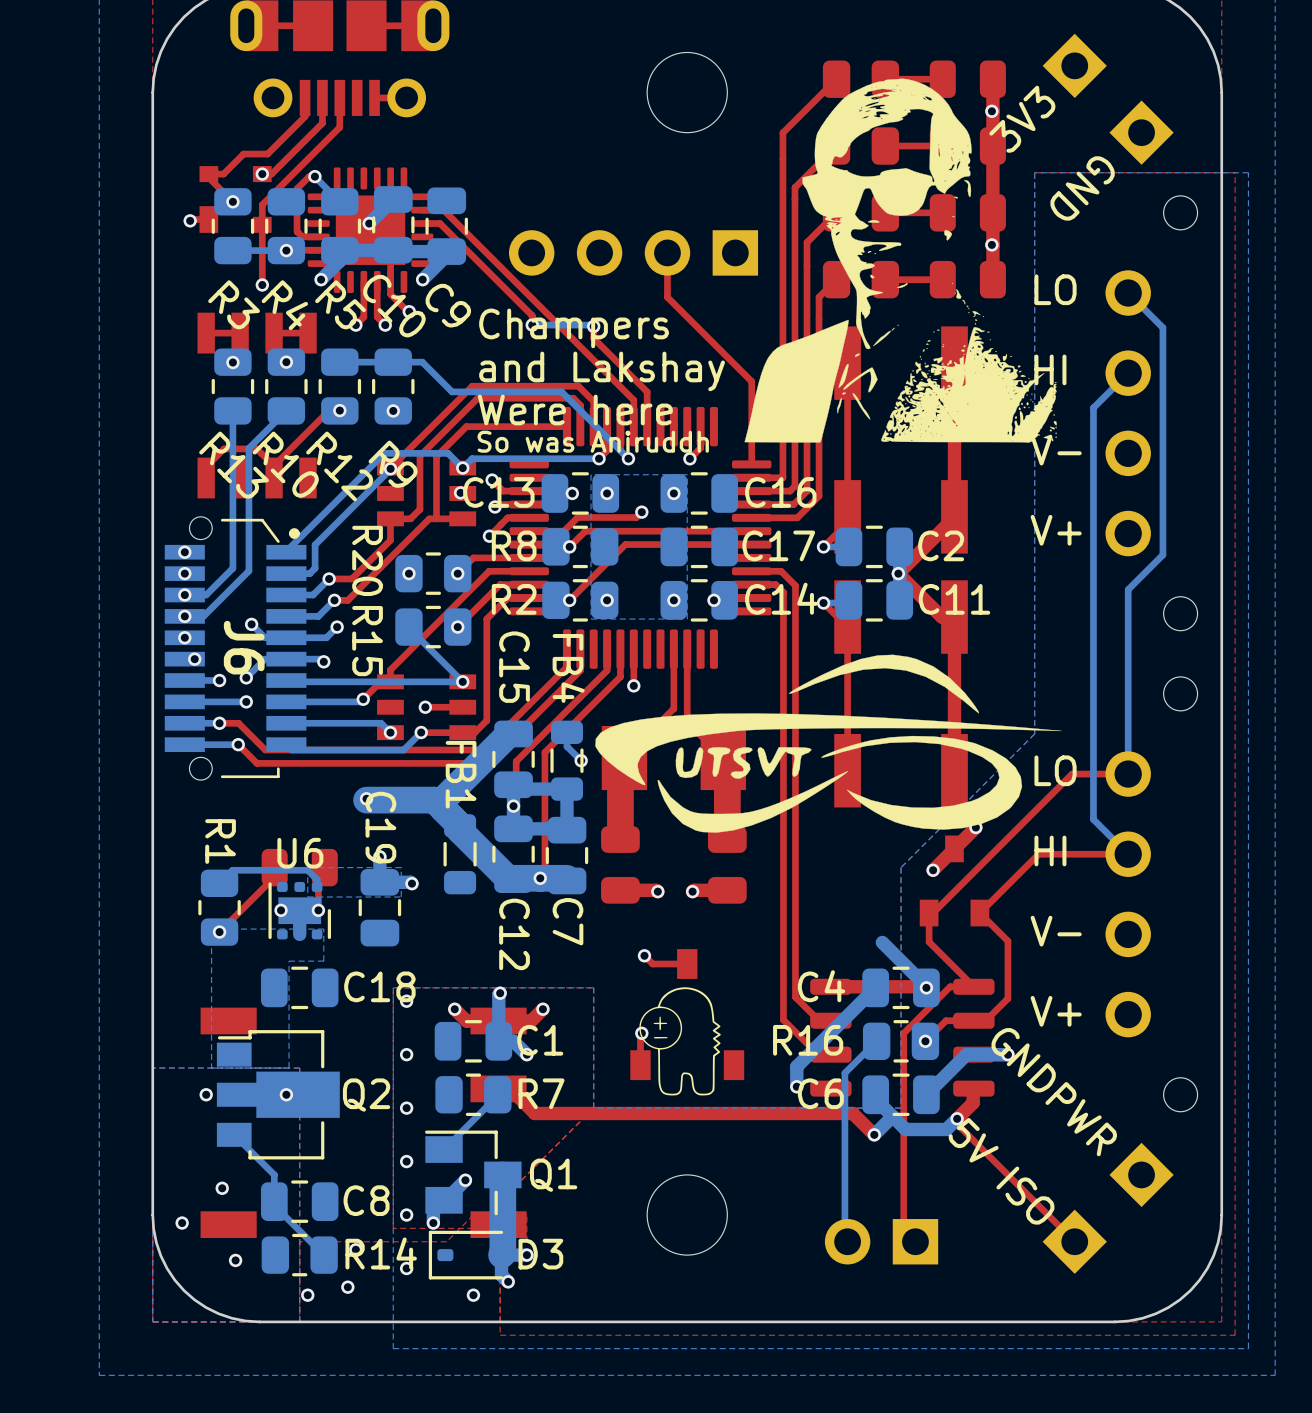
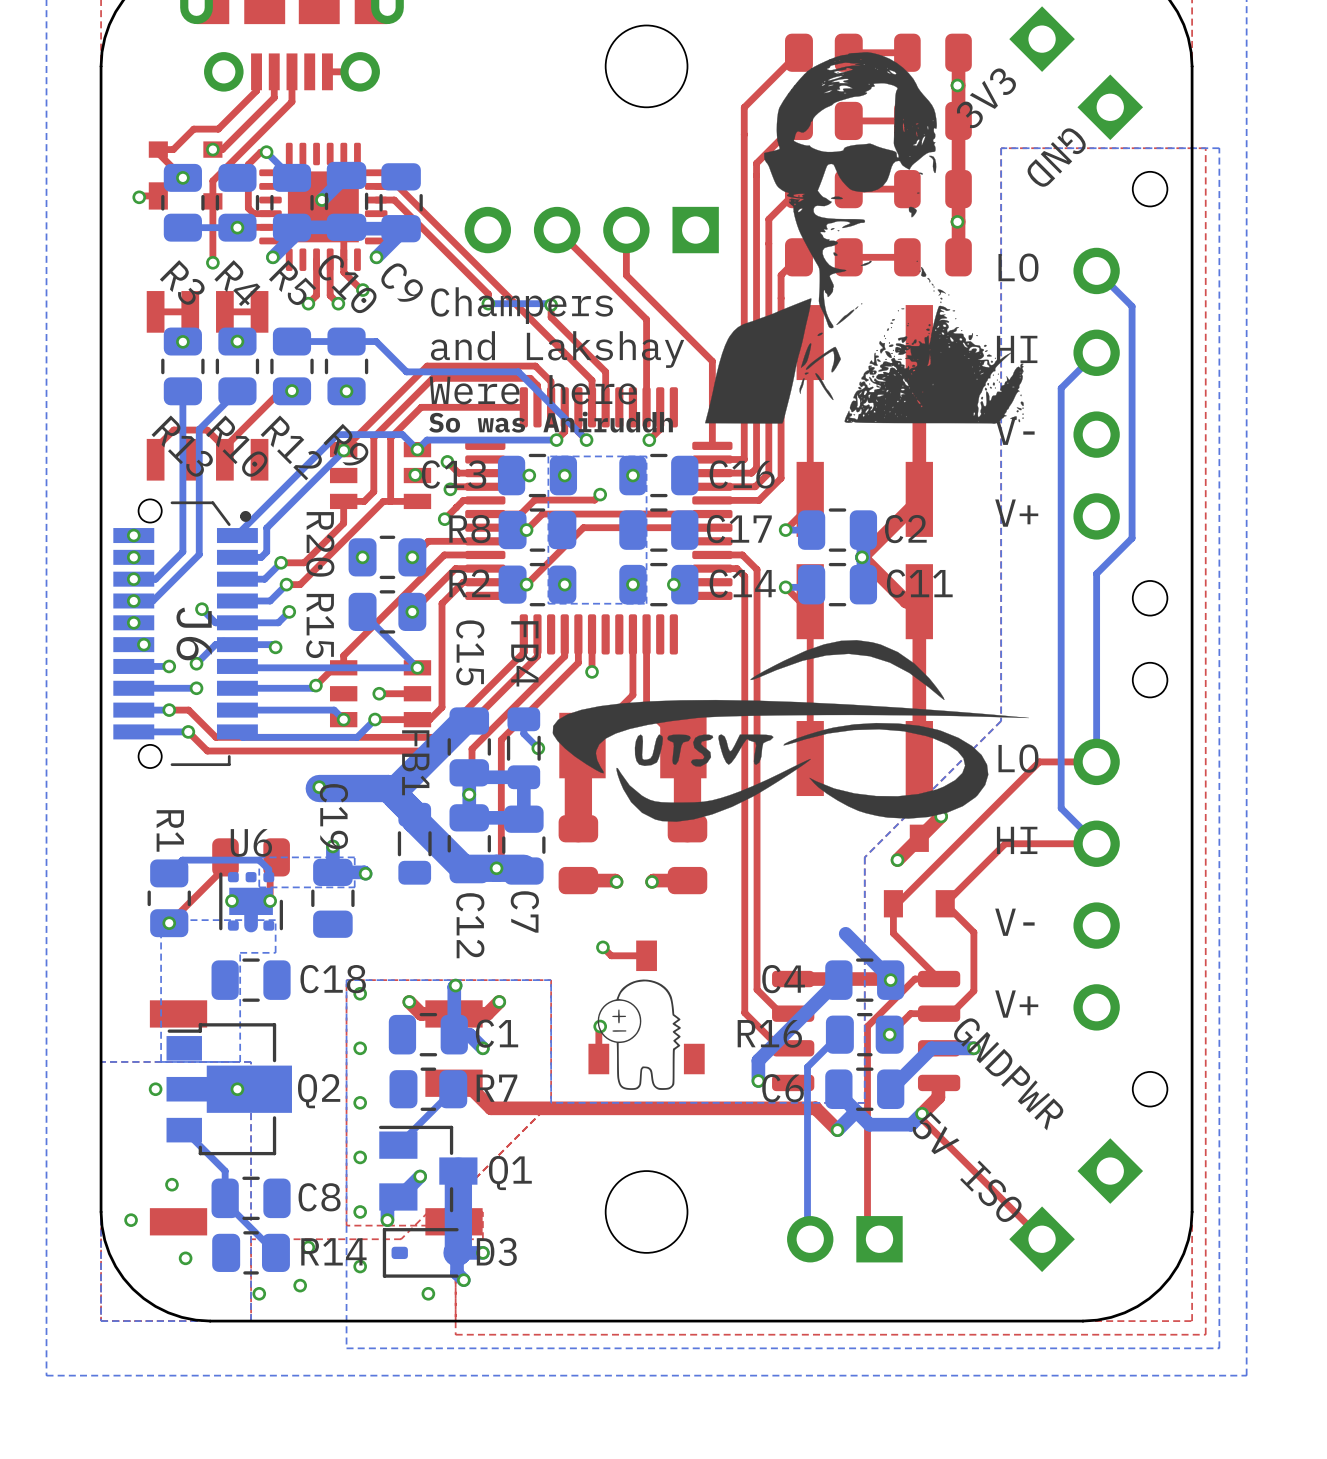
top track: none -> (557, 230) (646, 319) (646, 407)

